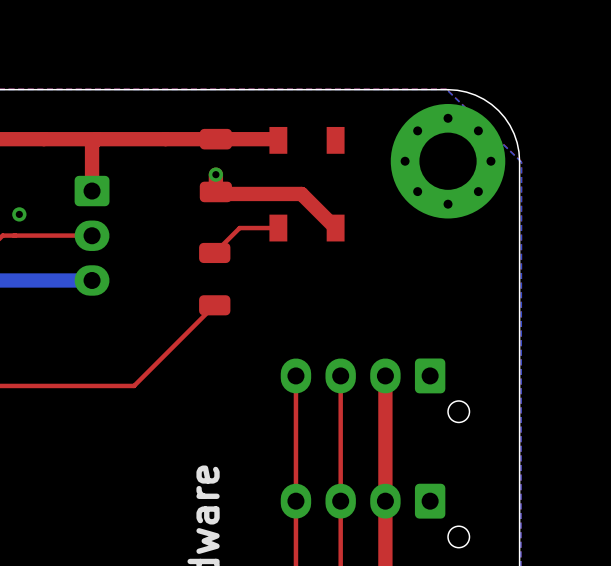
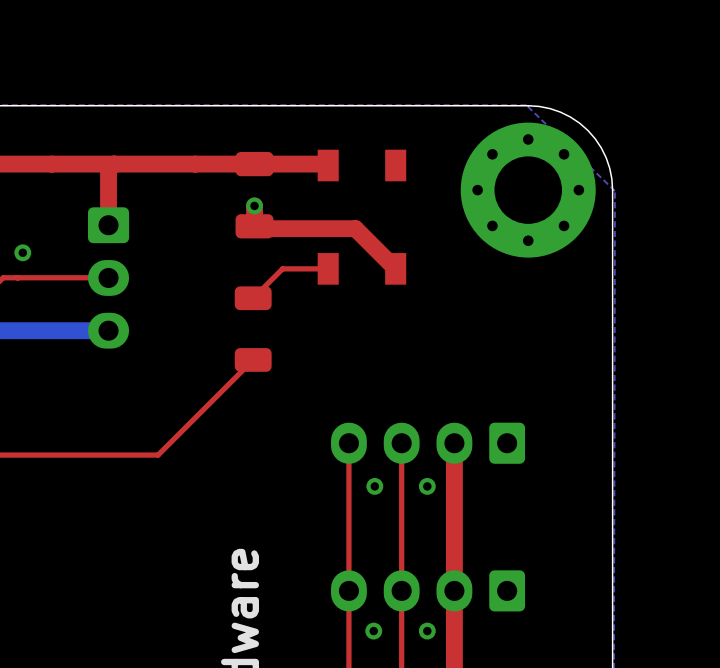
part: (375, 390) -> none
via: none -> (374, 486)
via: none -> (427, 486)
part: (375, 515) -> none
via: none -> (373, 631)
via: none -> (427, 631)

